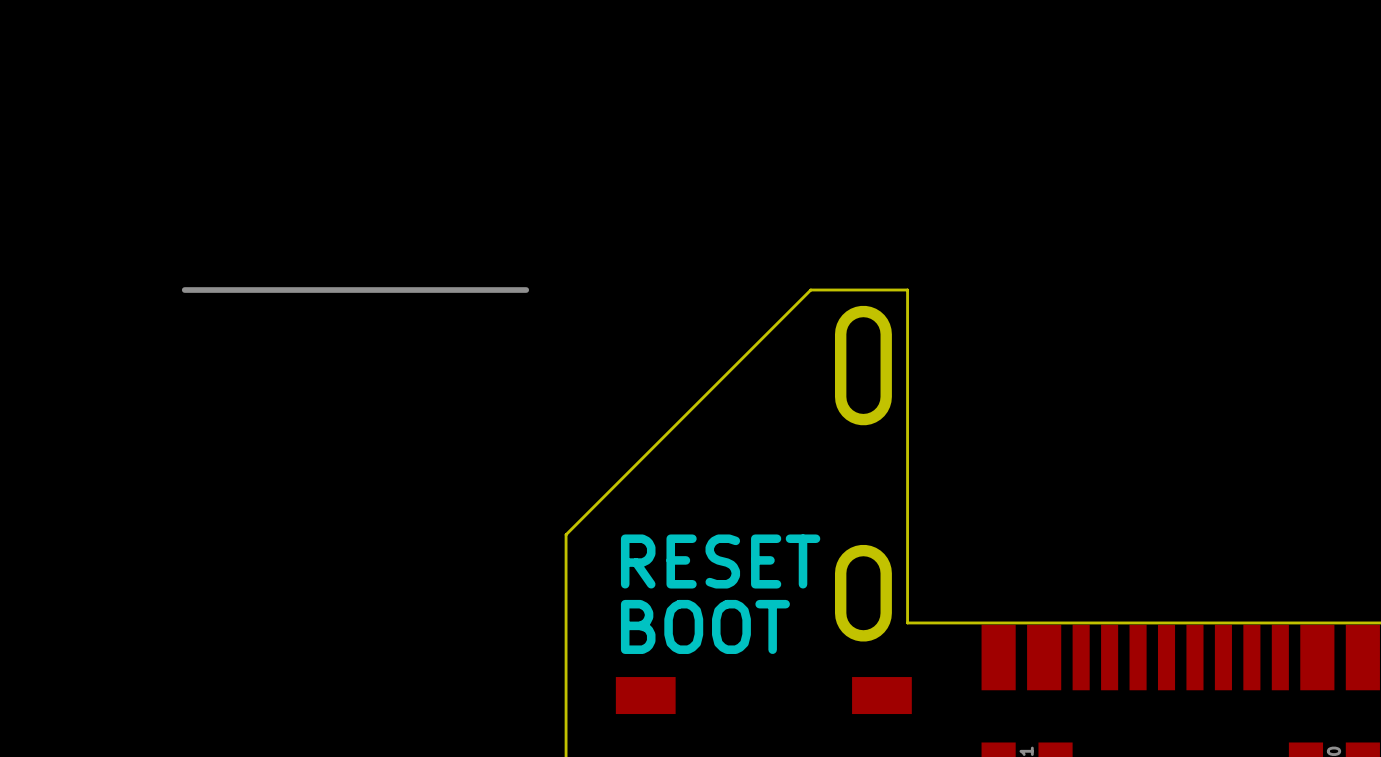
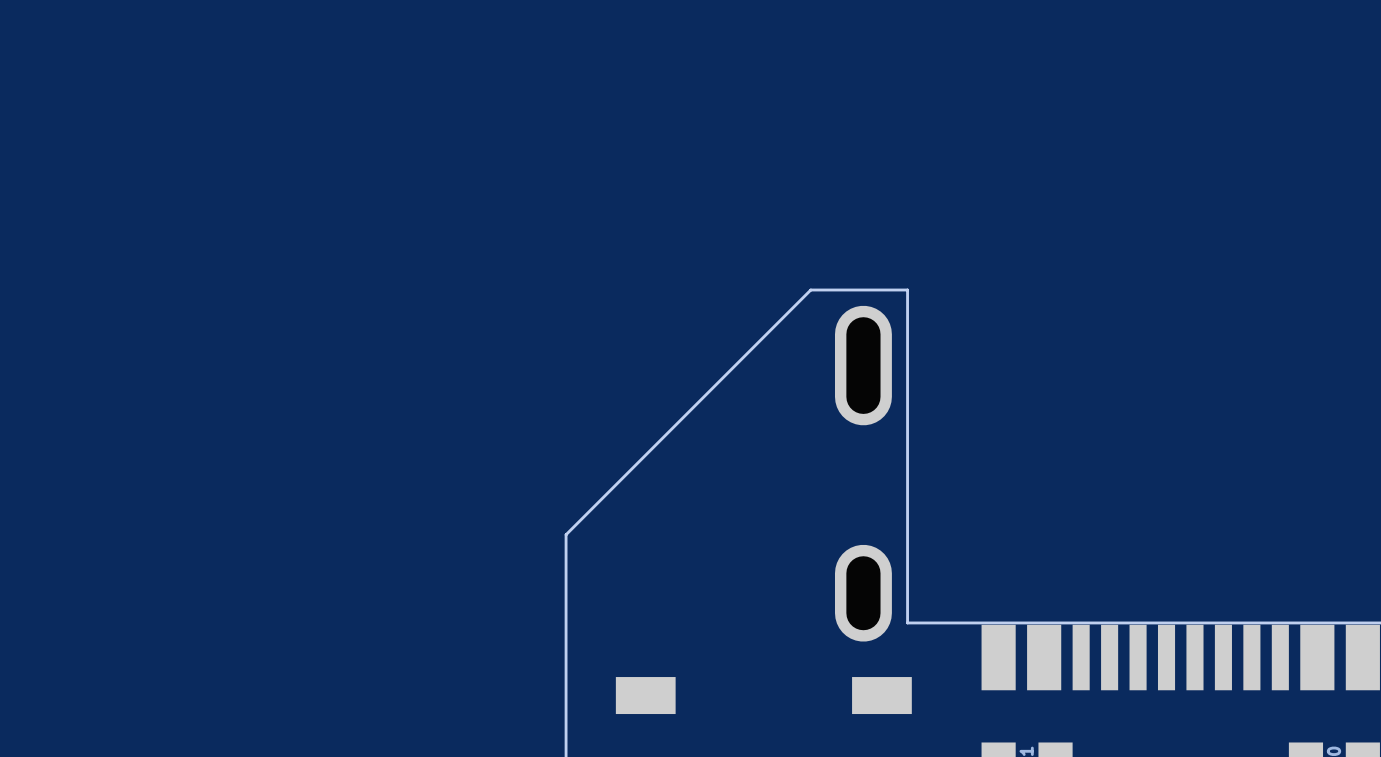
line: (184, 290) (526, 290) -> none
text: RESET (720, 561) -> none
text: BOOT (705, 626) -> none

